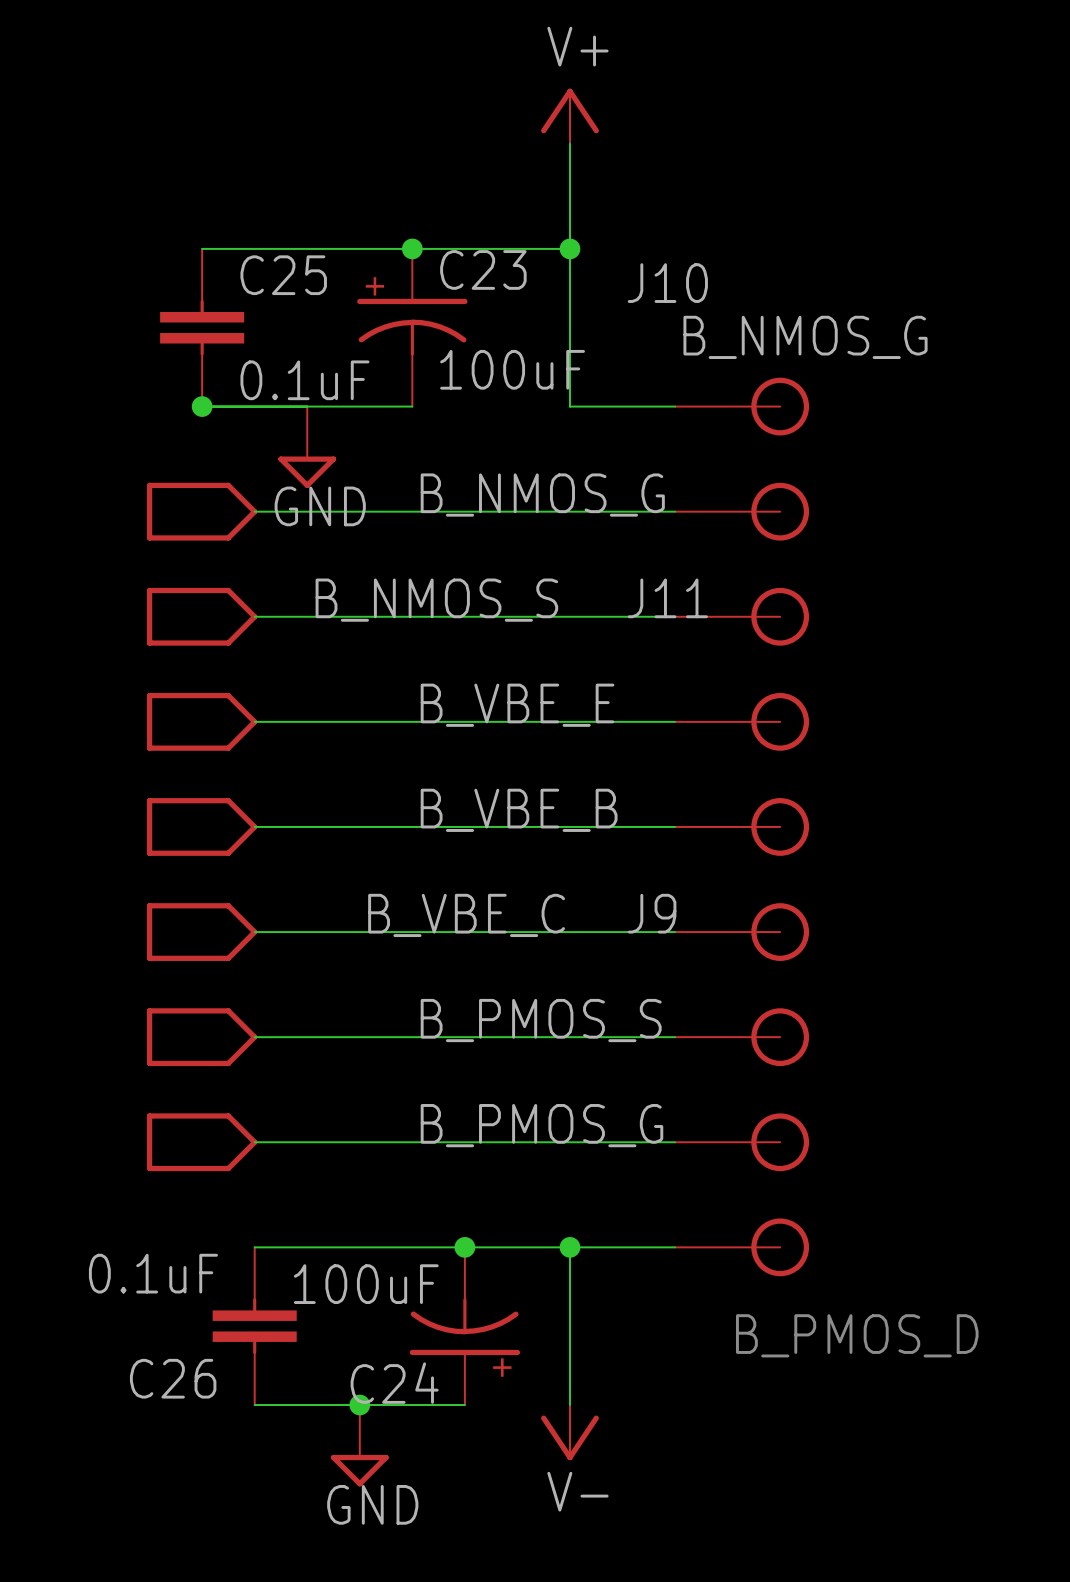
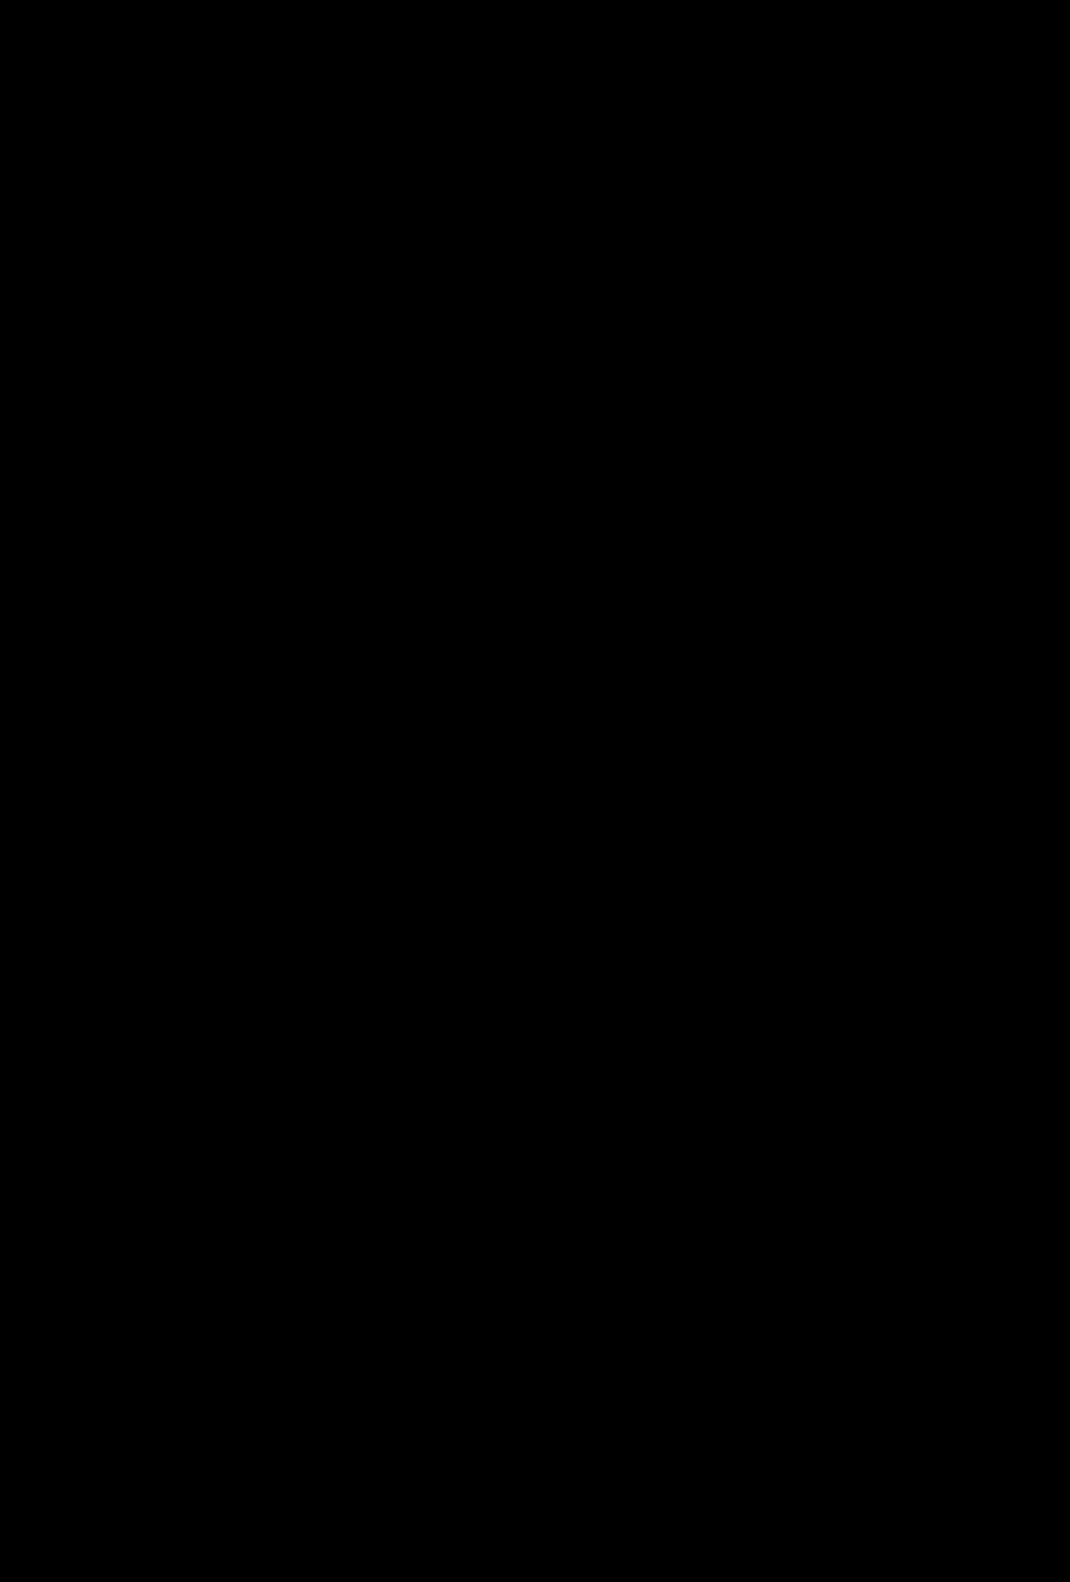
power symbol: V+ (569, 116) -> none
wire: (569, 143) (569, 406) (675, 406) -> none
wire: (202, 248) (569, 248) -> none
junction: (412, 248) -> none
junction: (569, 248) -> none
C25: 0.1uF (202, 327) -> none
C23: 100uF (412, 327) -> none
label: B_NMOS_G (805, 337) -> none
wire: (202, 406) (412, 406) -> none
junction: (202, 406) -> none
power symbol: GND (307, 447) -> none
label: B_NMOS_G (542, 495) -> none
part: (202, 511) -> none
wire: (254, 511) (675, 511) -> none
J10: (742, 511) -> none
label: B_NMOS_S (436, 600) -> none
part: (202, 616) -> none
wire: (254, 616) (675, 616) -> none
label: B_VBE_E (517, 705) -> none
part: (202, 721) -> none
wire: (254, 721) (675, 721) -> none
label: B_VBE_B (519, 810) -> none
part: (202, 826) -> none
wire: (254, 826) (675, 826) -> none
J11: (742, 826) -> none
label: B_VBE_C (466, 915) -> none
part: (202, 932) -> none
wire: (254, 932) (675, 932) -> none
label: B_PMOS_S (541, 1020) -> none
part: (202, 1037) -> none
wire: (254, 1037) (675, 1037) -> none
label: B_PMOS_G (541, 1125) -> none
part: (202, 1142) -> none
wire: (254, 1142) (675, 1142) -> none
J9: (742, 1142) -> none
wire: (254, 1247) (675, 1247) -> none
junction: (464, 1247) -> none
wire: (569, 1247) (569, 1405) -> none
junction: (569, 1247) -> none
C26: 0.1uF (254, 1326) -> none
C24: 100uF (464, 1326) -> none
text: B_PMOS_D (857, 1335) -> none
wire: (254, 1405) (464, 1405) -> none
junction: (359, 1405) -> none
power symbol: V- (569, 1432) -> none
power symbol: GND (359, 1445) -> none

